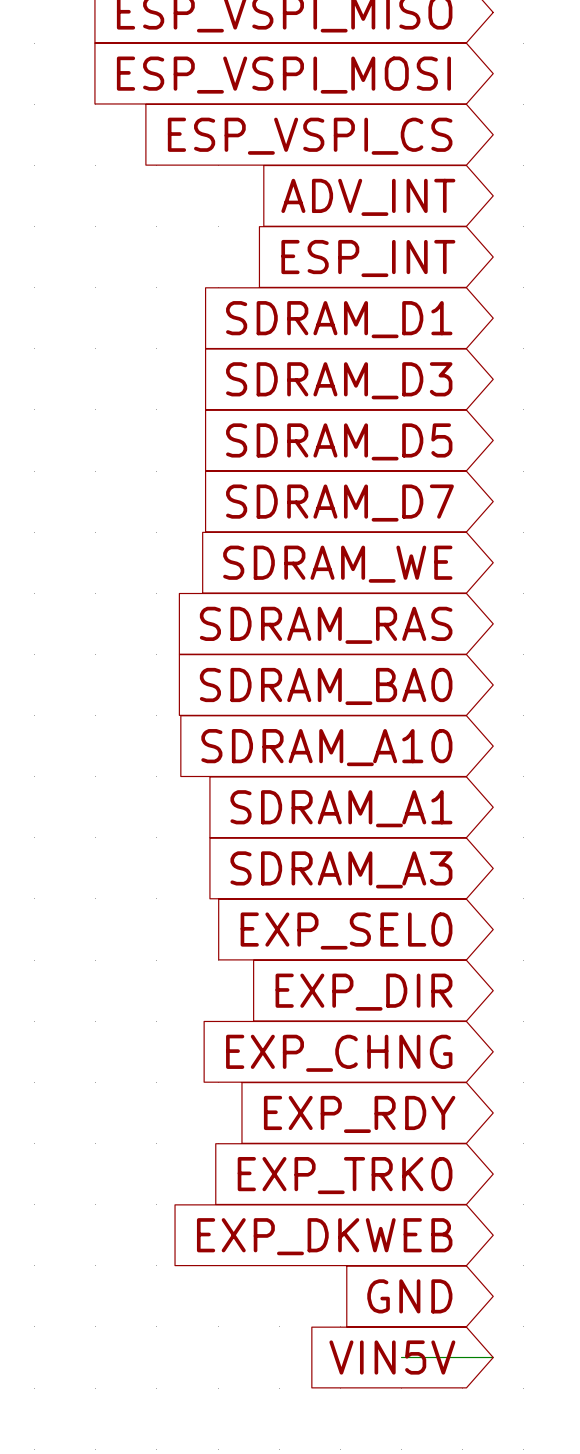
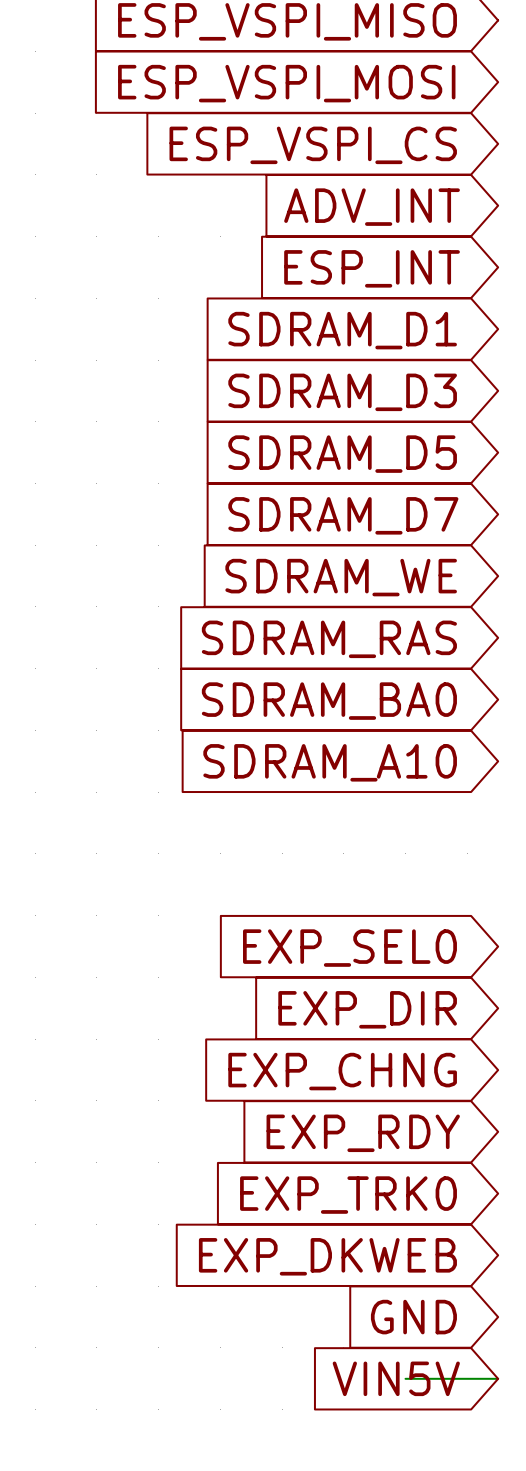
global label: SDRAM_A1 (341, 808) -> none
global label: SDRAM_A3 (341, 869) -> none

